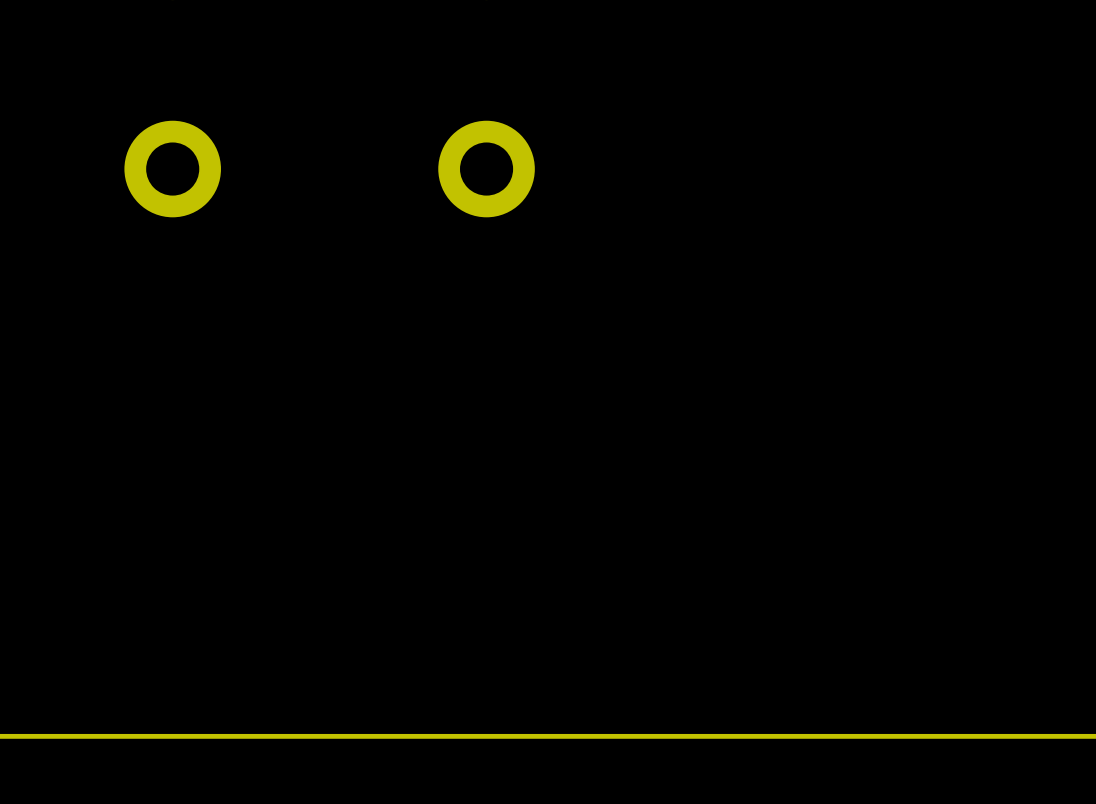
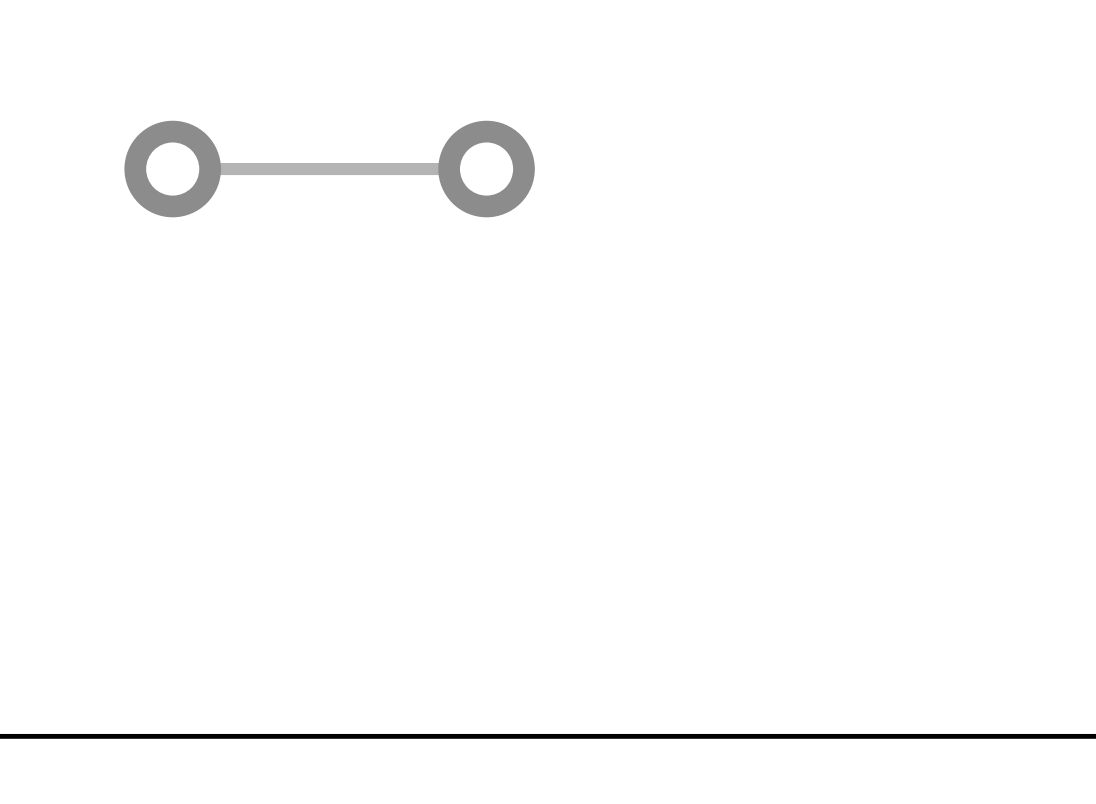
track: none -> (486, 169) (172, 169)

